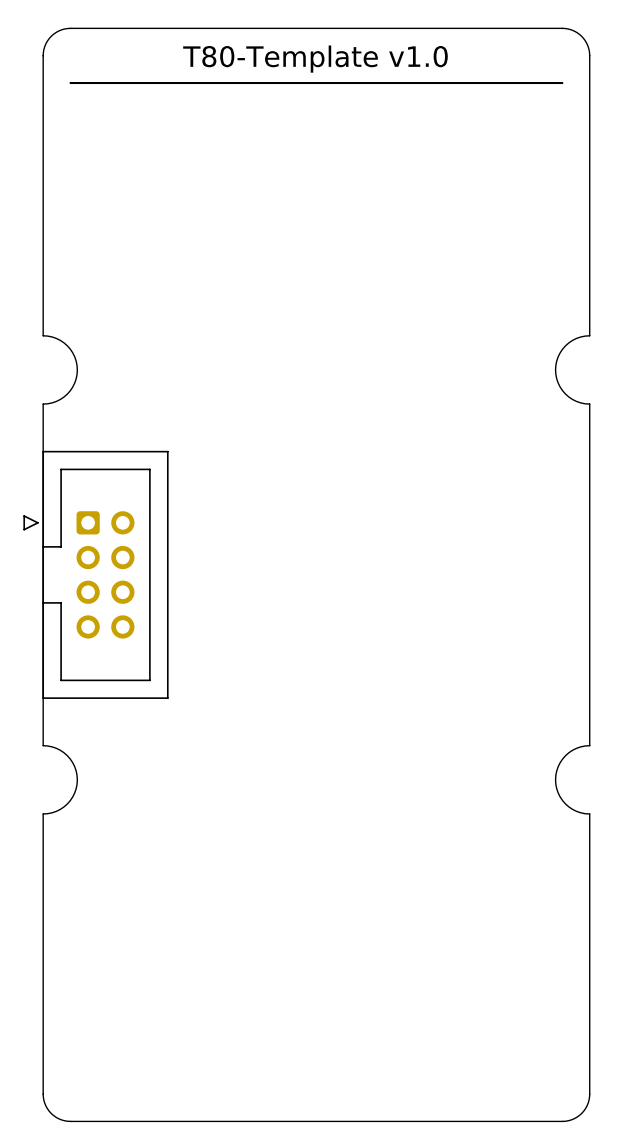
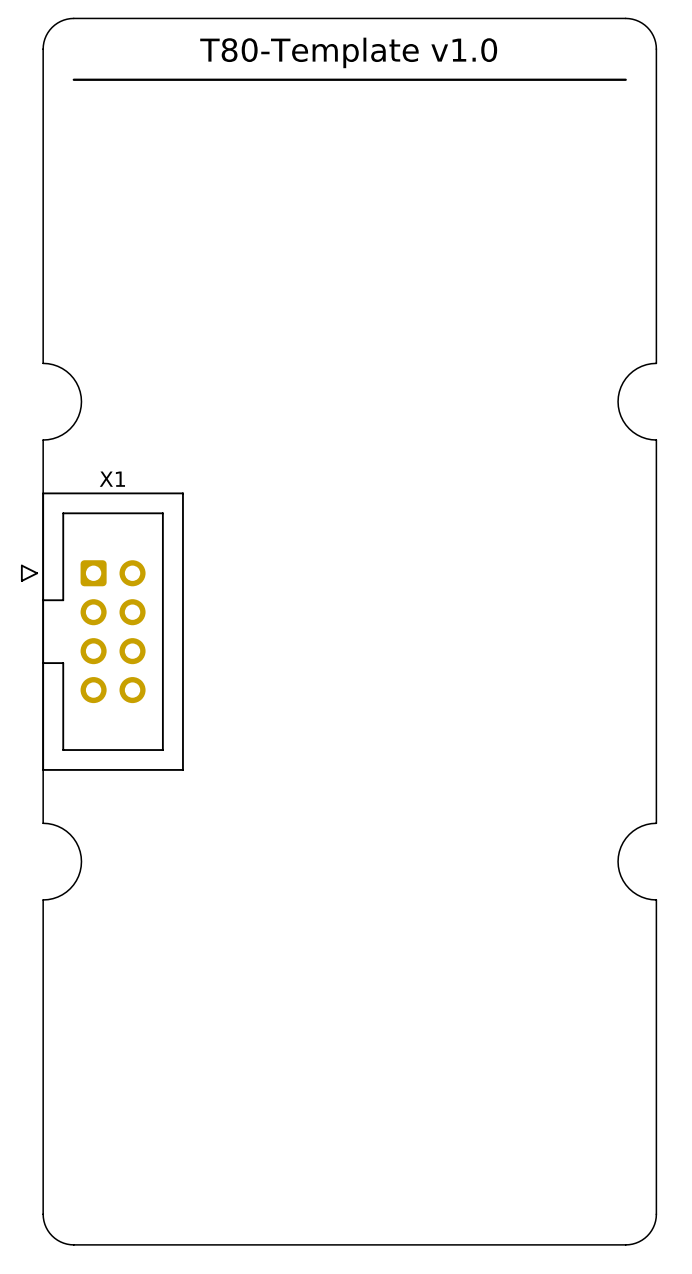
X1 name: none -> X1 (112, 479)

